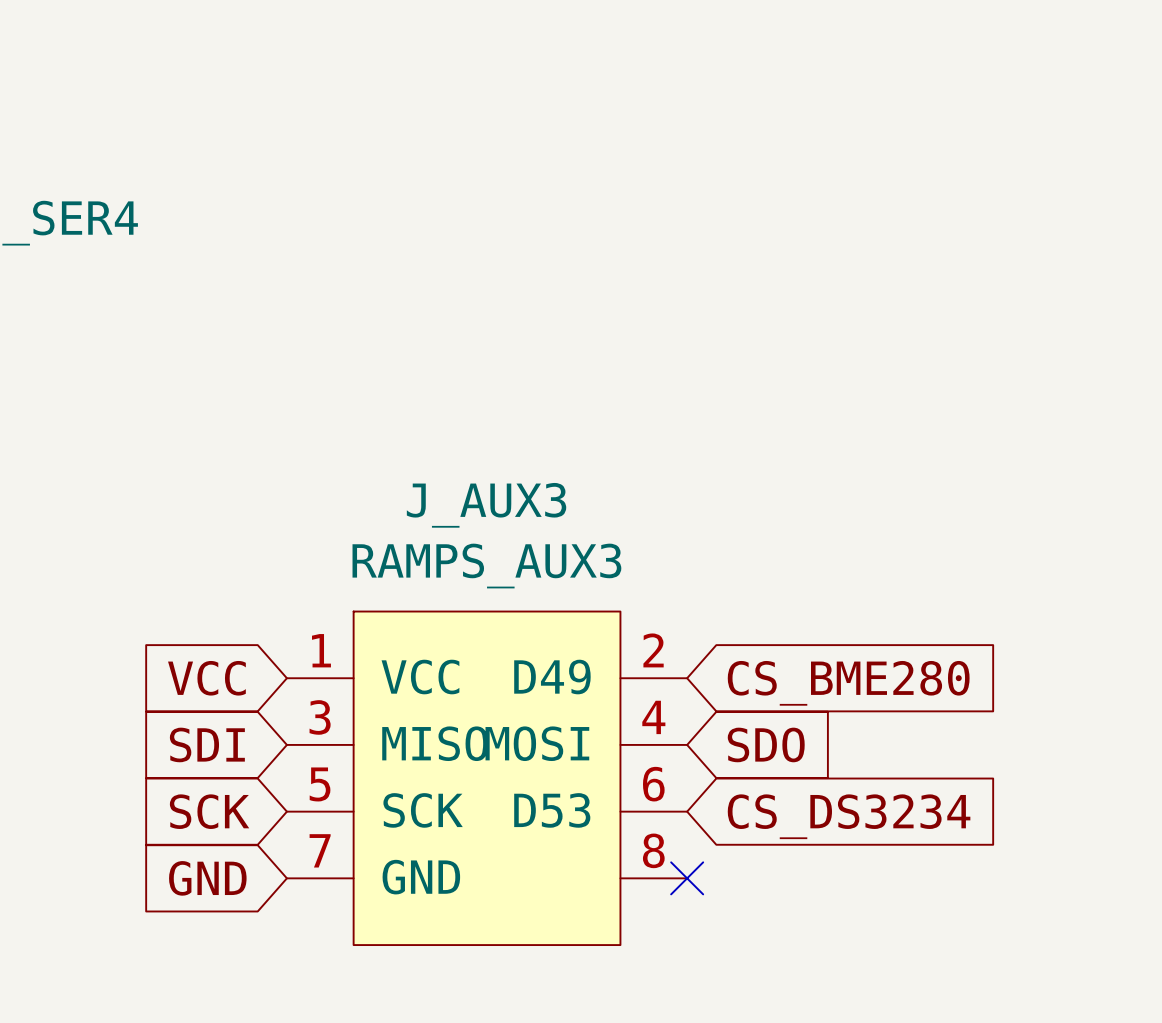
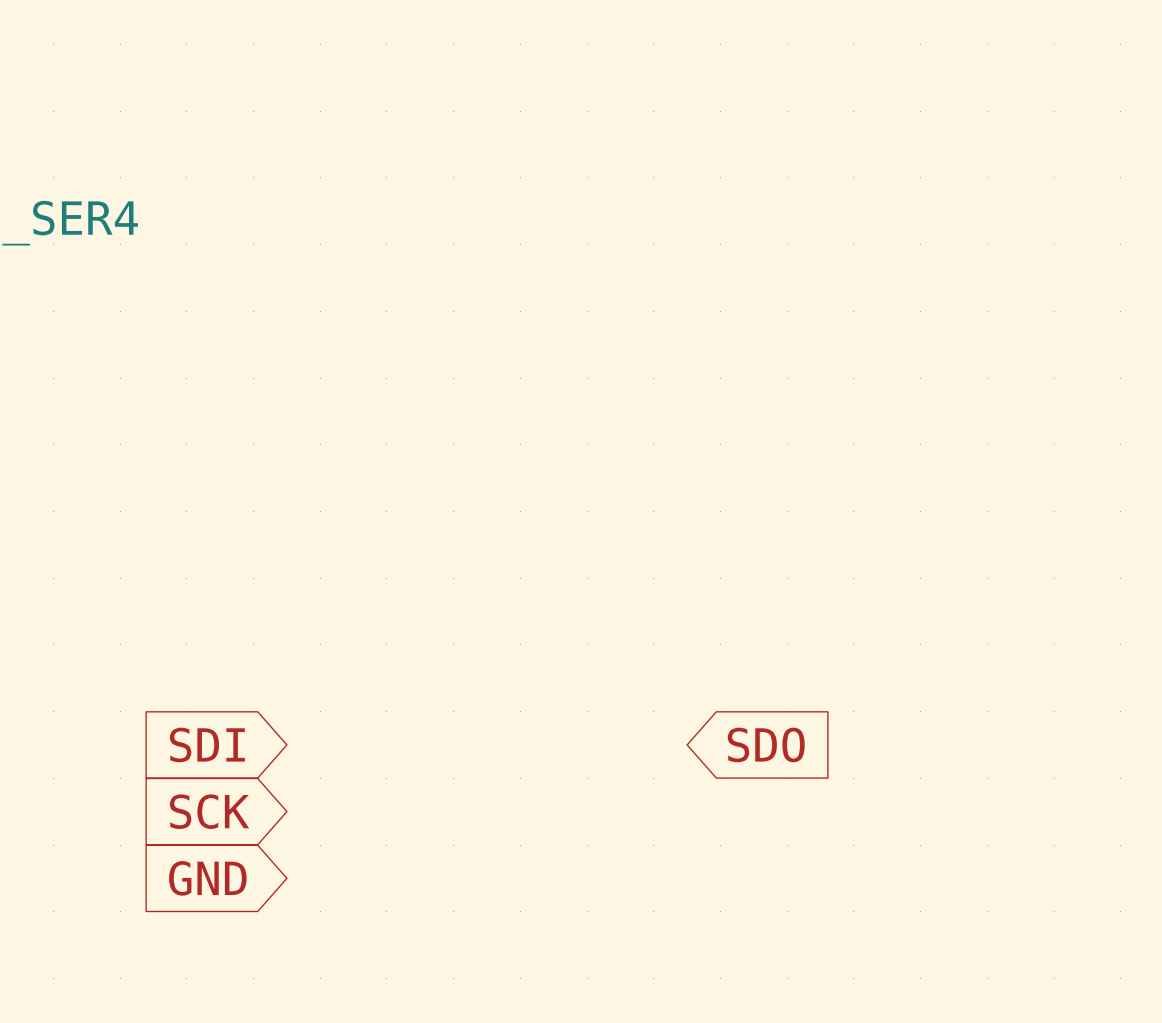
global label: VCC (206, 678) -> none
global label: CS_BME280 (848, 683) -> none
J_AUX3: RAMPS_AUX3 (487, 778) -> none
global label: CS_DS3234 (849, 816) -> none
no-connect mark: (687, 878) -> none

